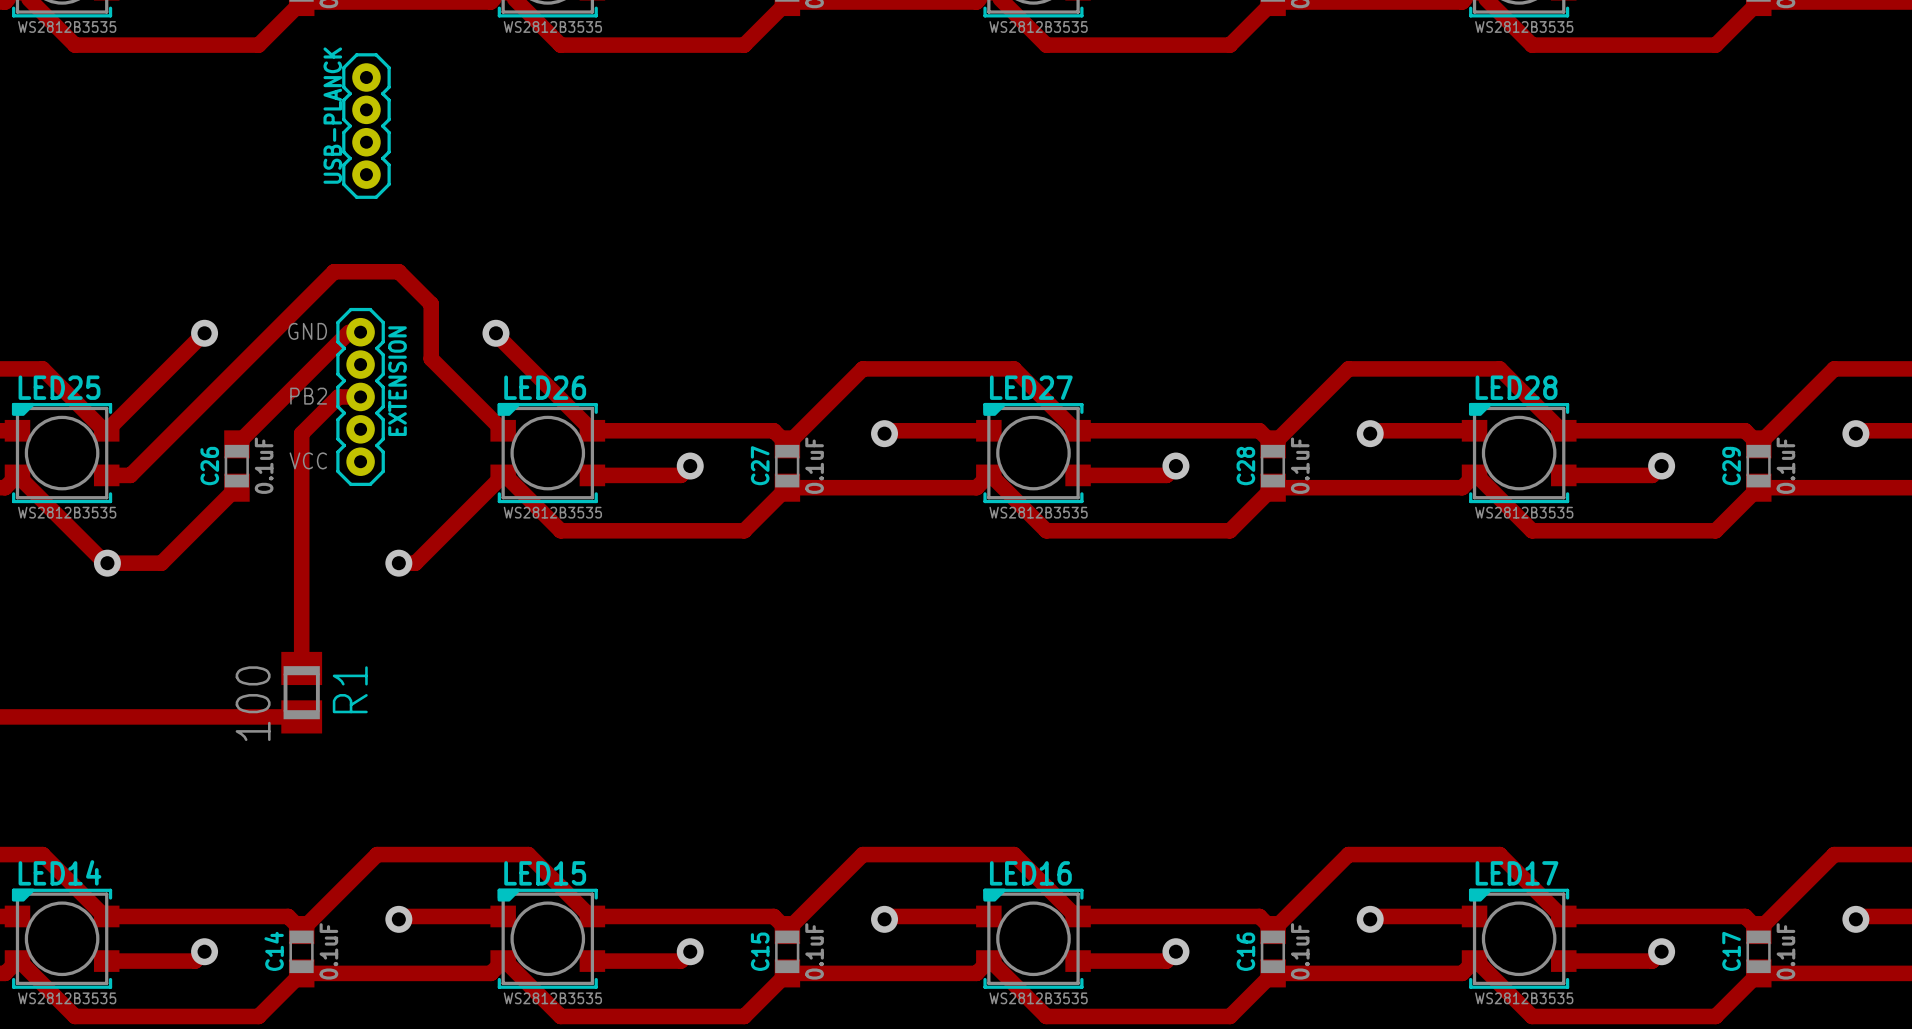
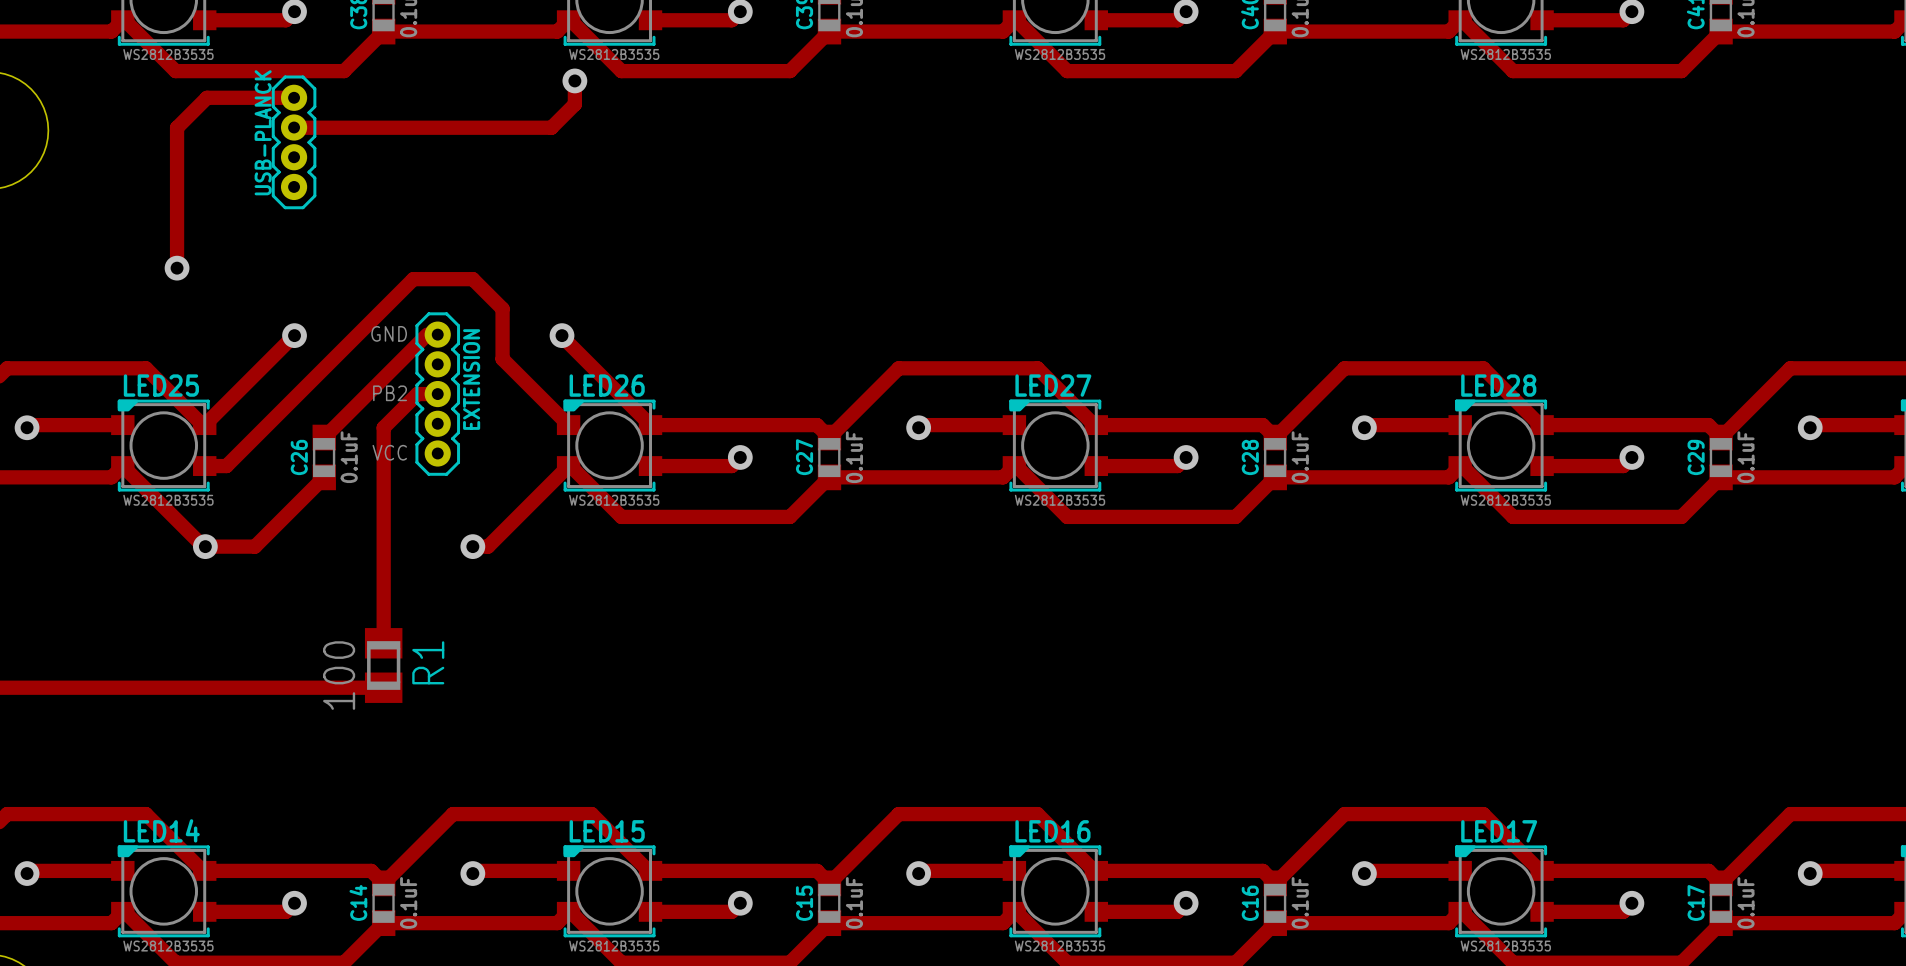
track: none -> (574, 80) (574, 104) (551, 127) (294, 127)
via: none -> (574, 80)
track: none -> (294, 97) (207, 97) (177, 127) (177, 268)
USB-PLANCK position: (366, 126) -> (294, 142)
via: none -> (177, 268)

